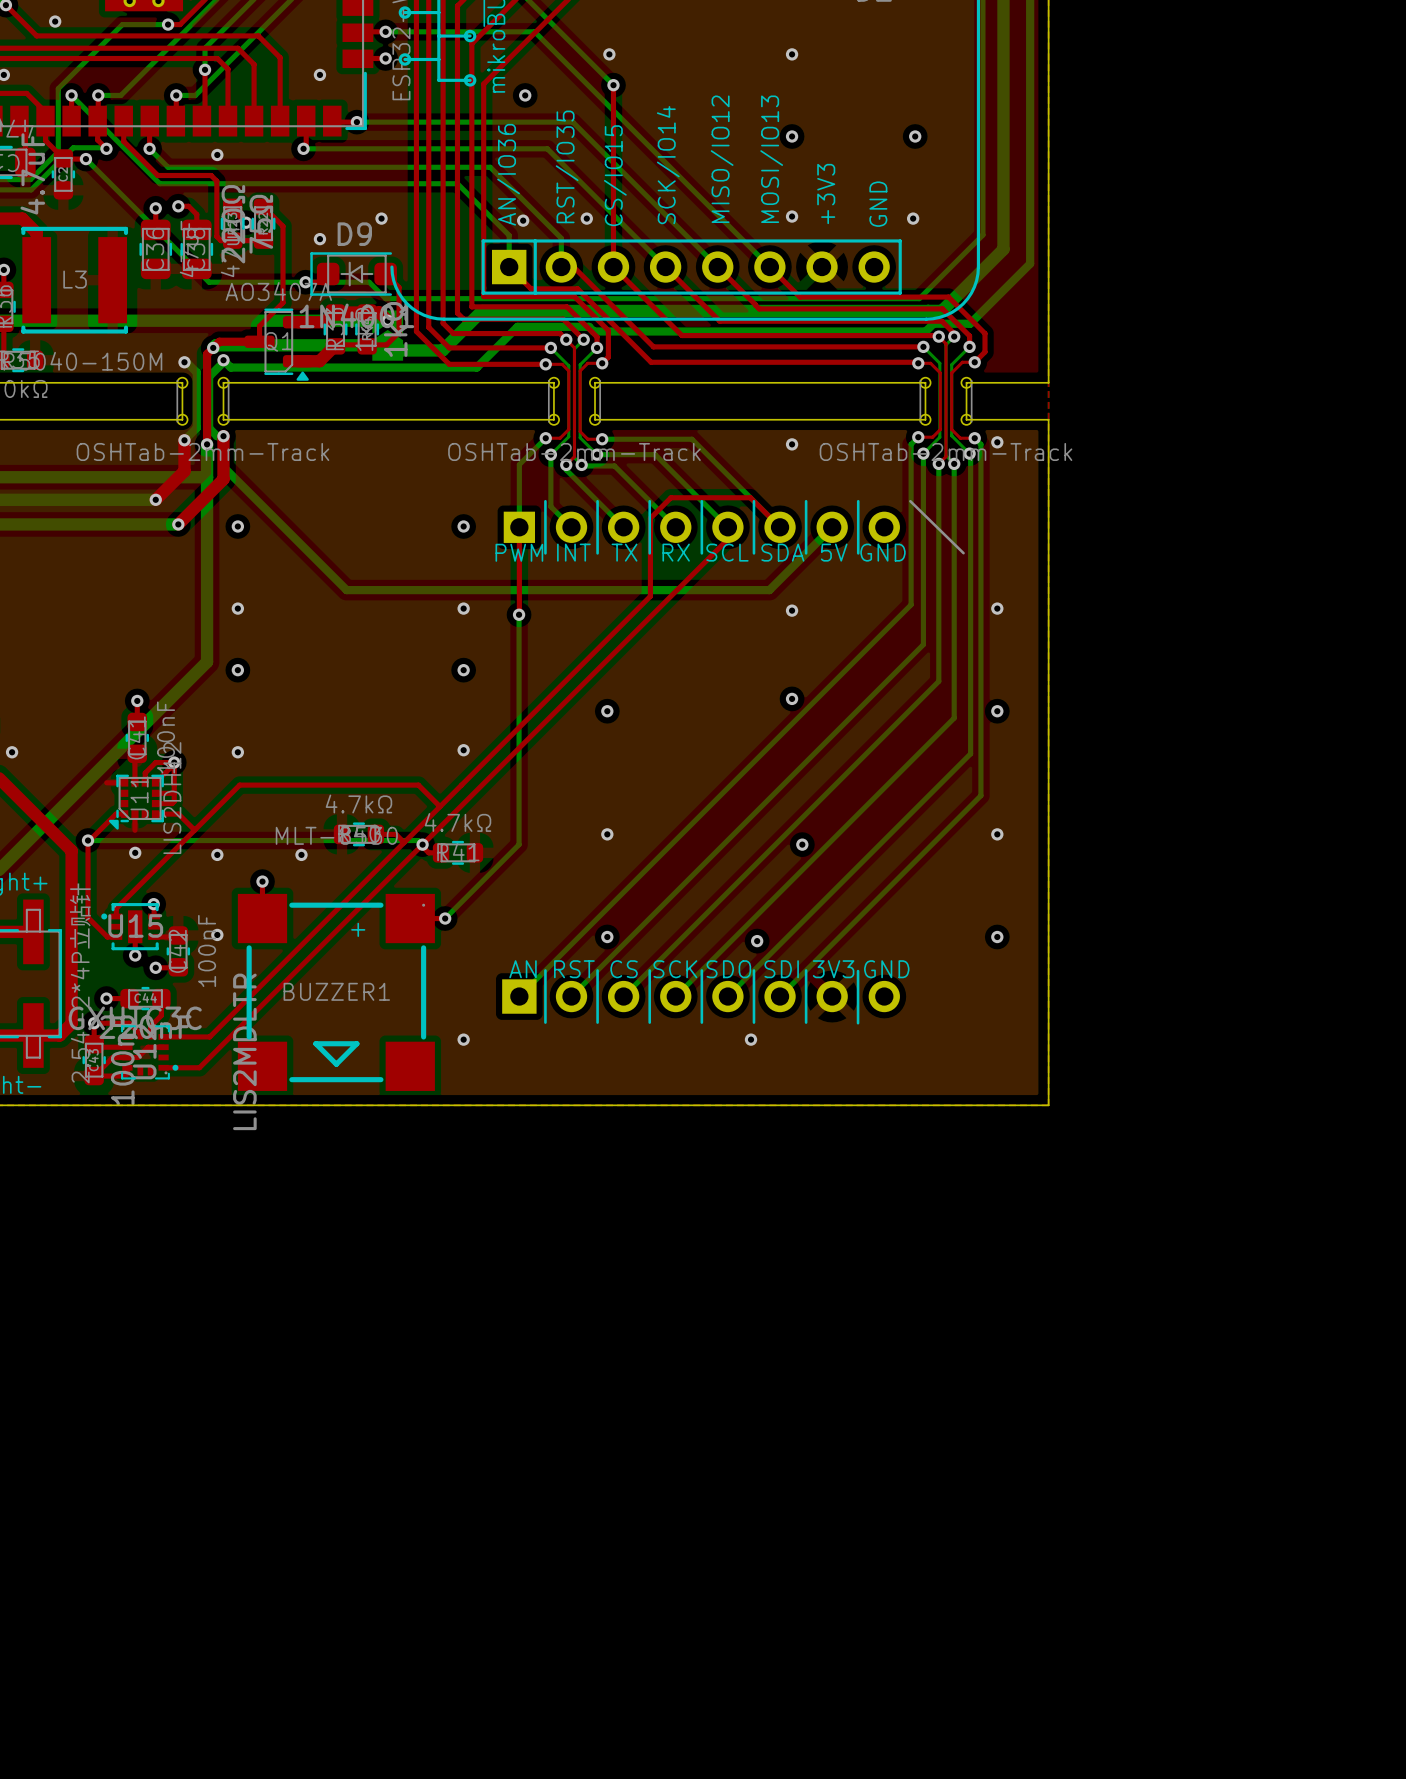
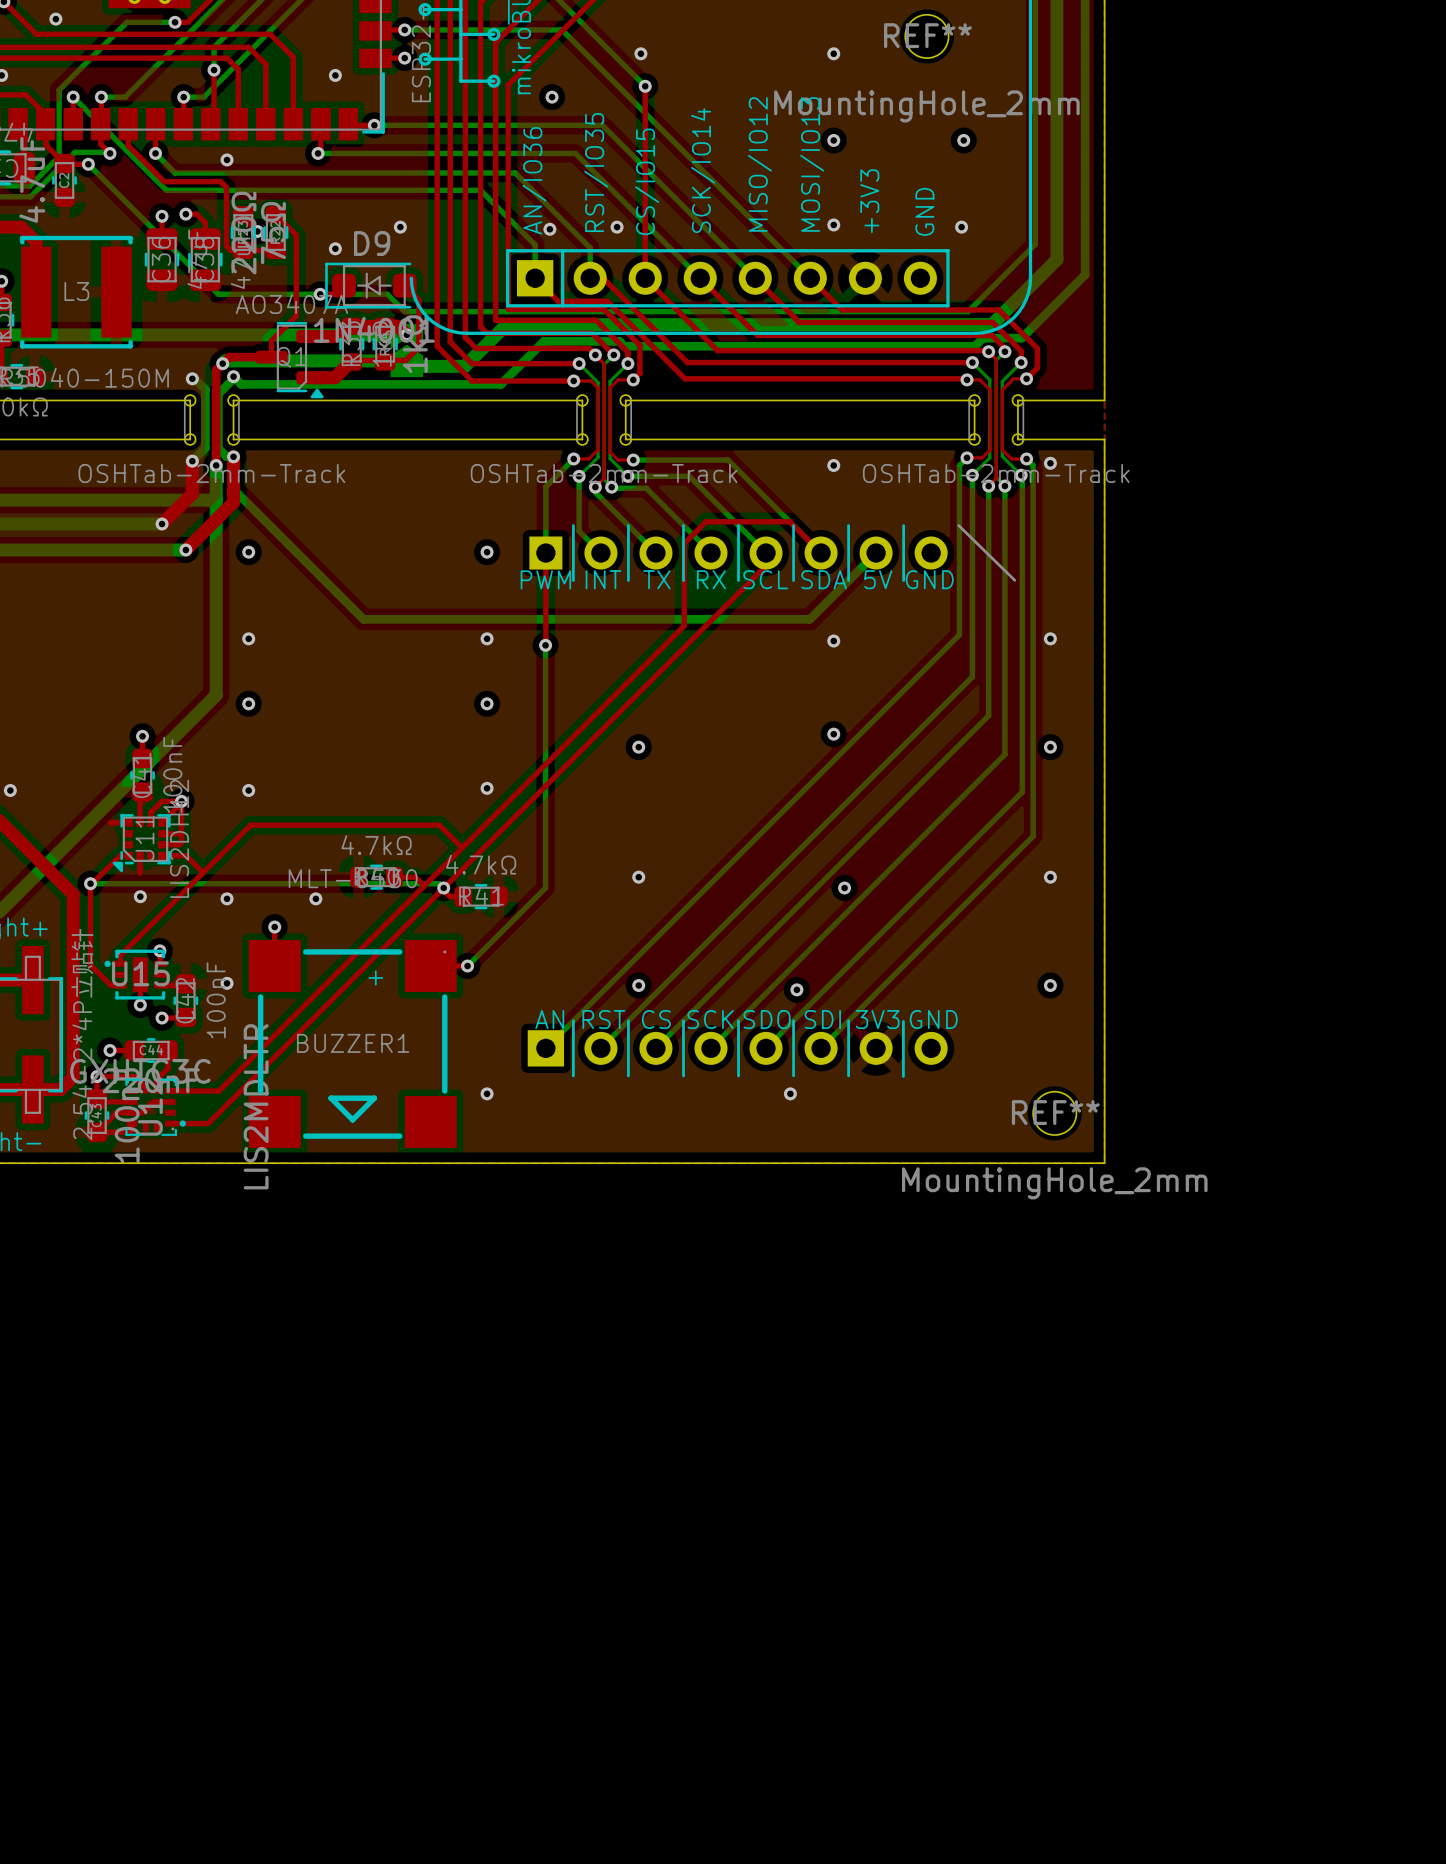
REF**: none -> MountingHole_2mm (926, 36)
REF**: none -> MountingHole_2mm (1054, 1113)

